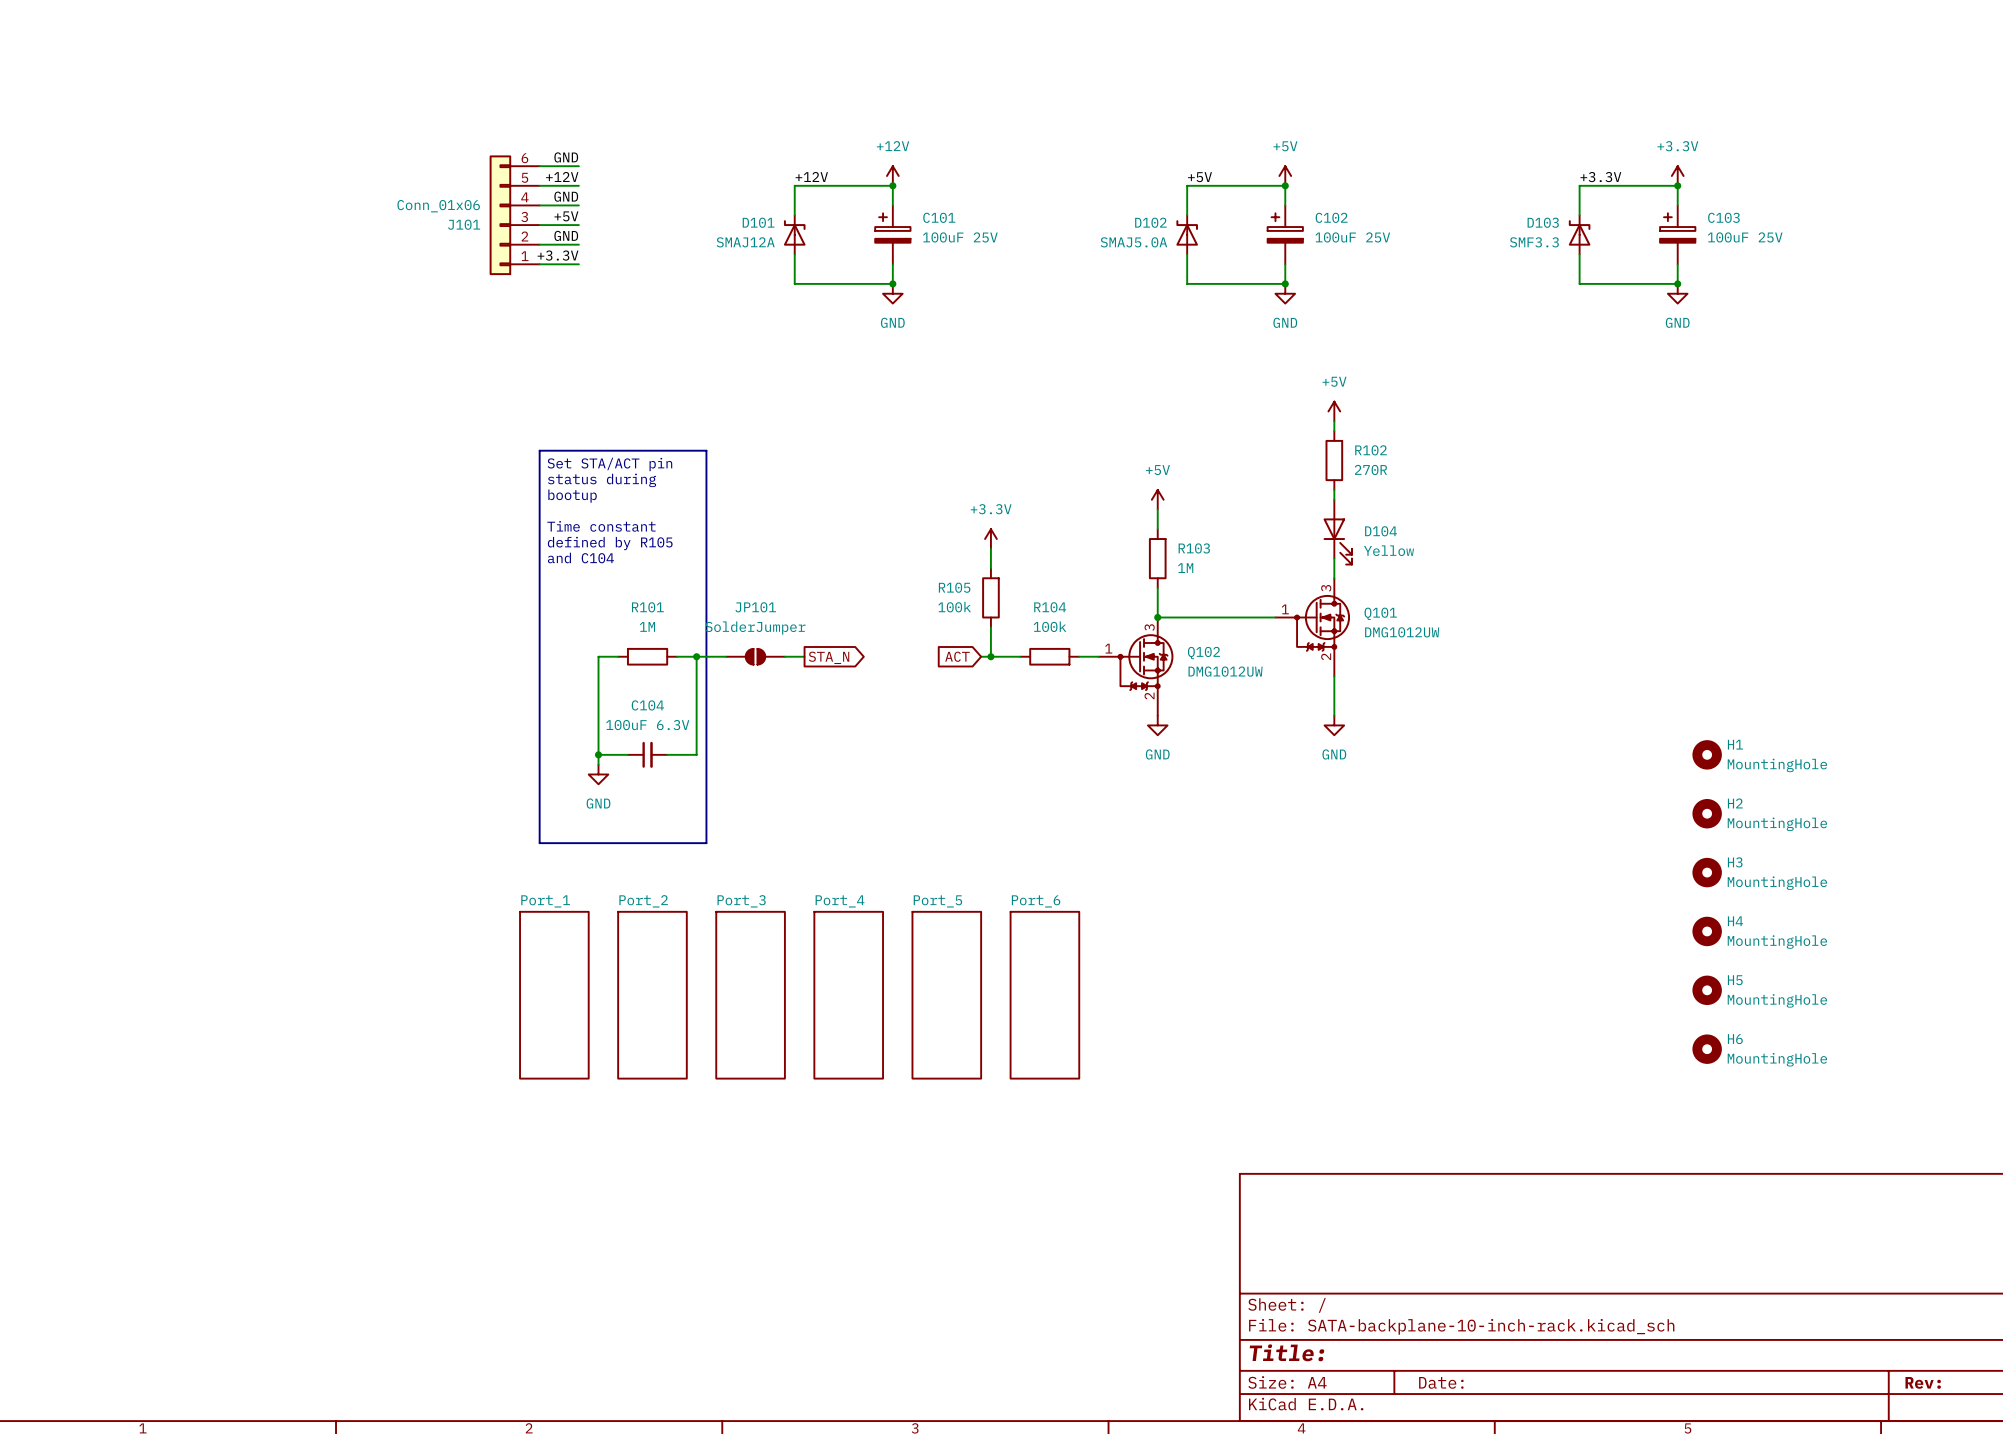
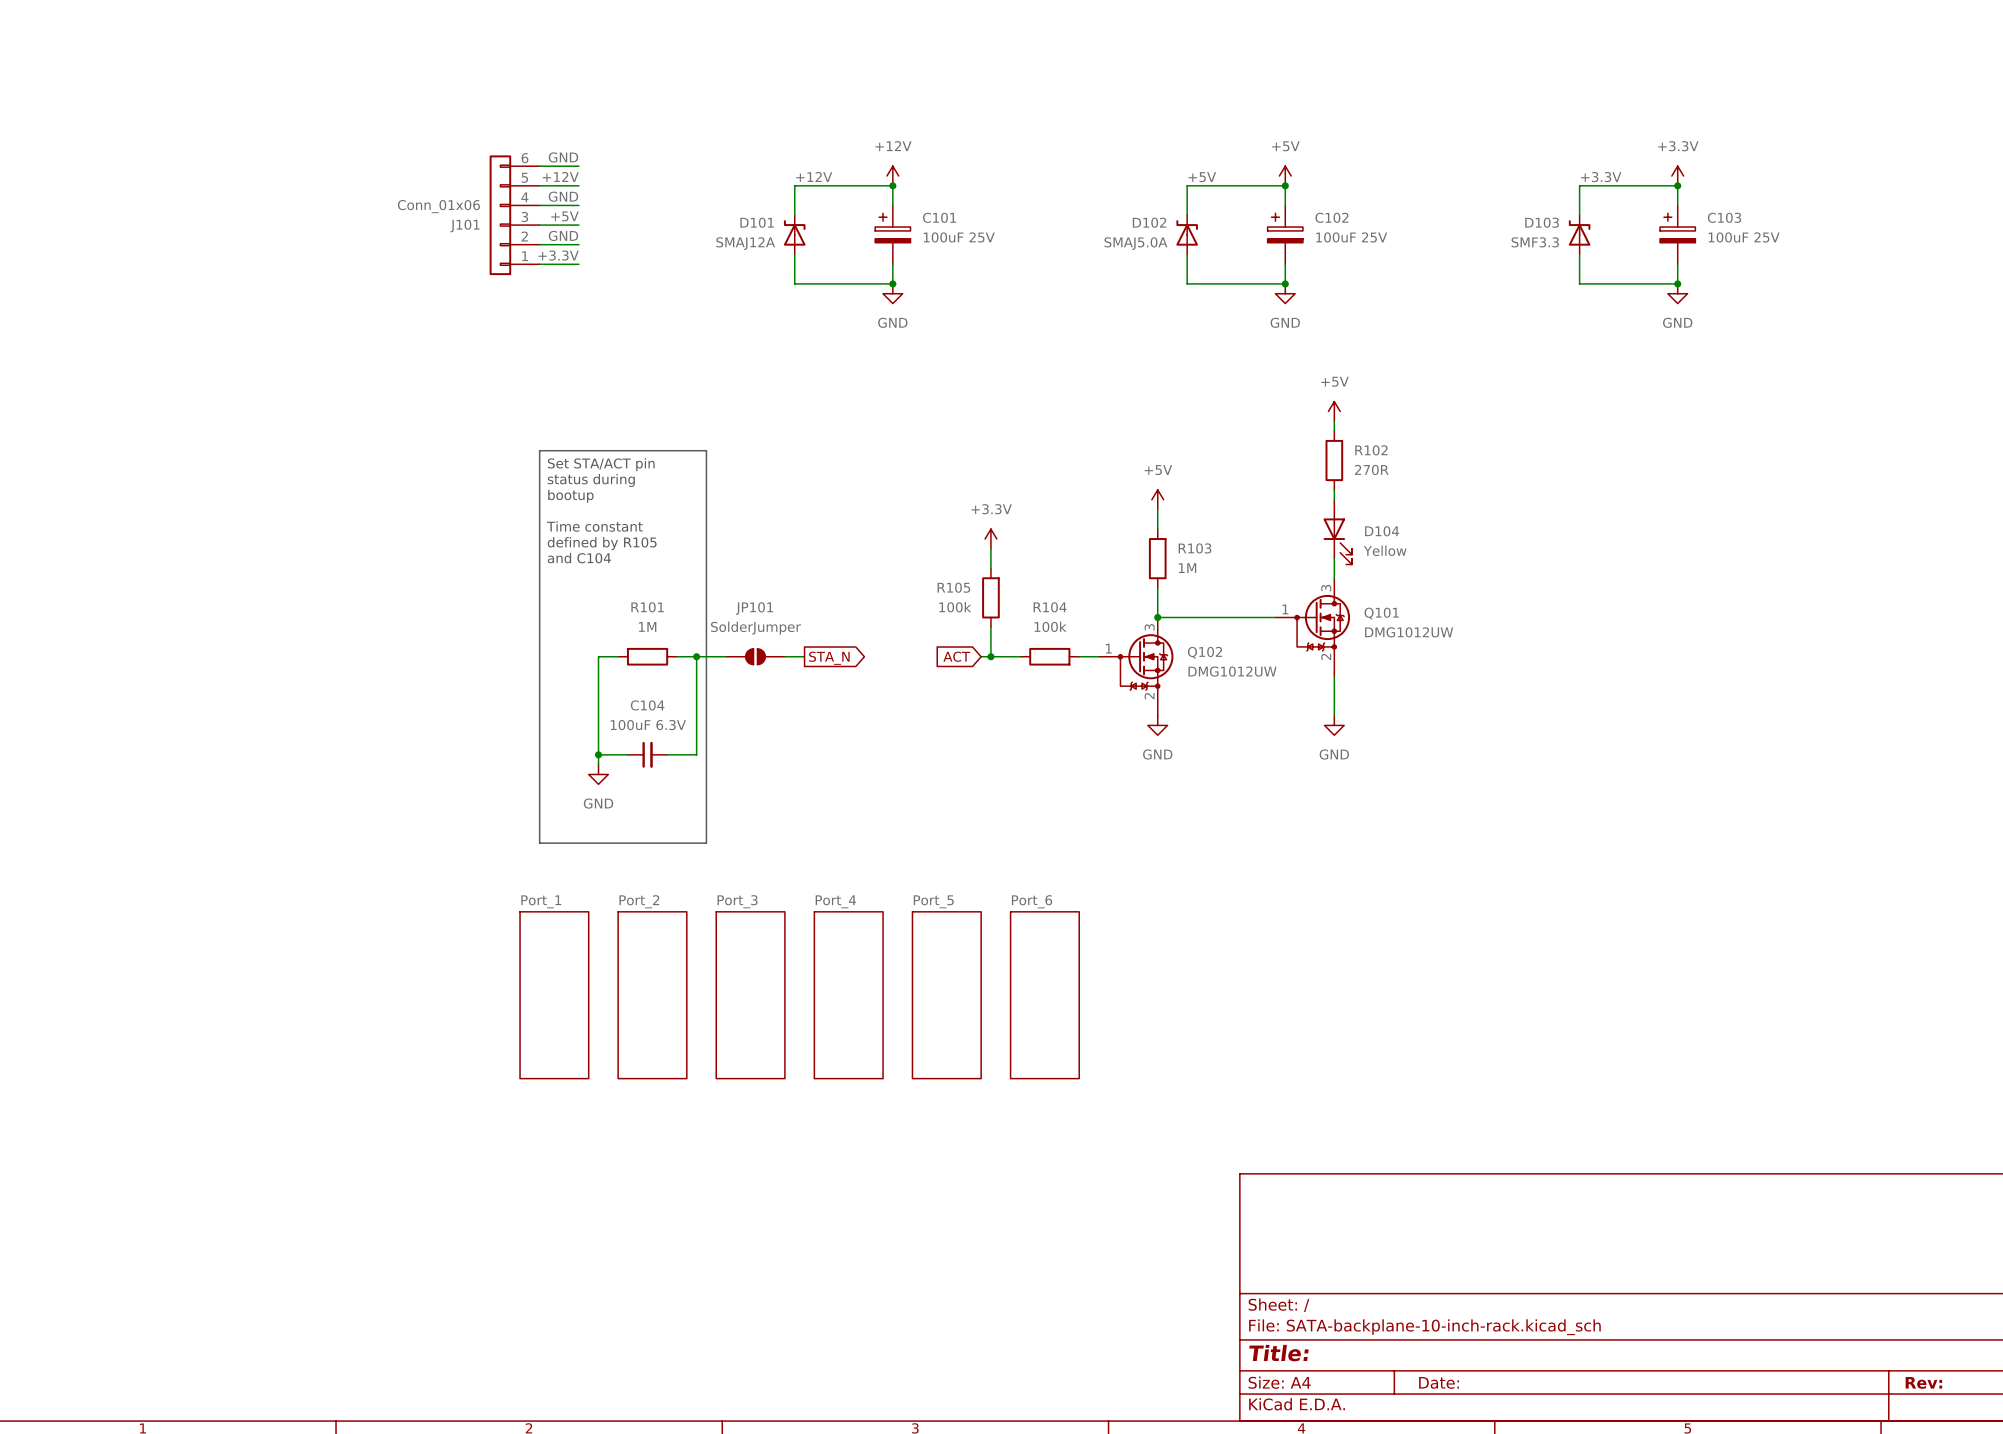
H1: MountingHole (1707, 754) -> none
H2: MountingHole (1707, 813) -> none
H3: MountingHole (1707, 872) -> none
H4: MountingHole (1707, 931) -> none
H5: MountingHole (1707, 990) -> none
H6: MountingHole (1707, 1049) -> none

